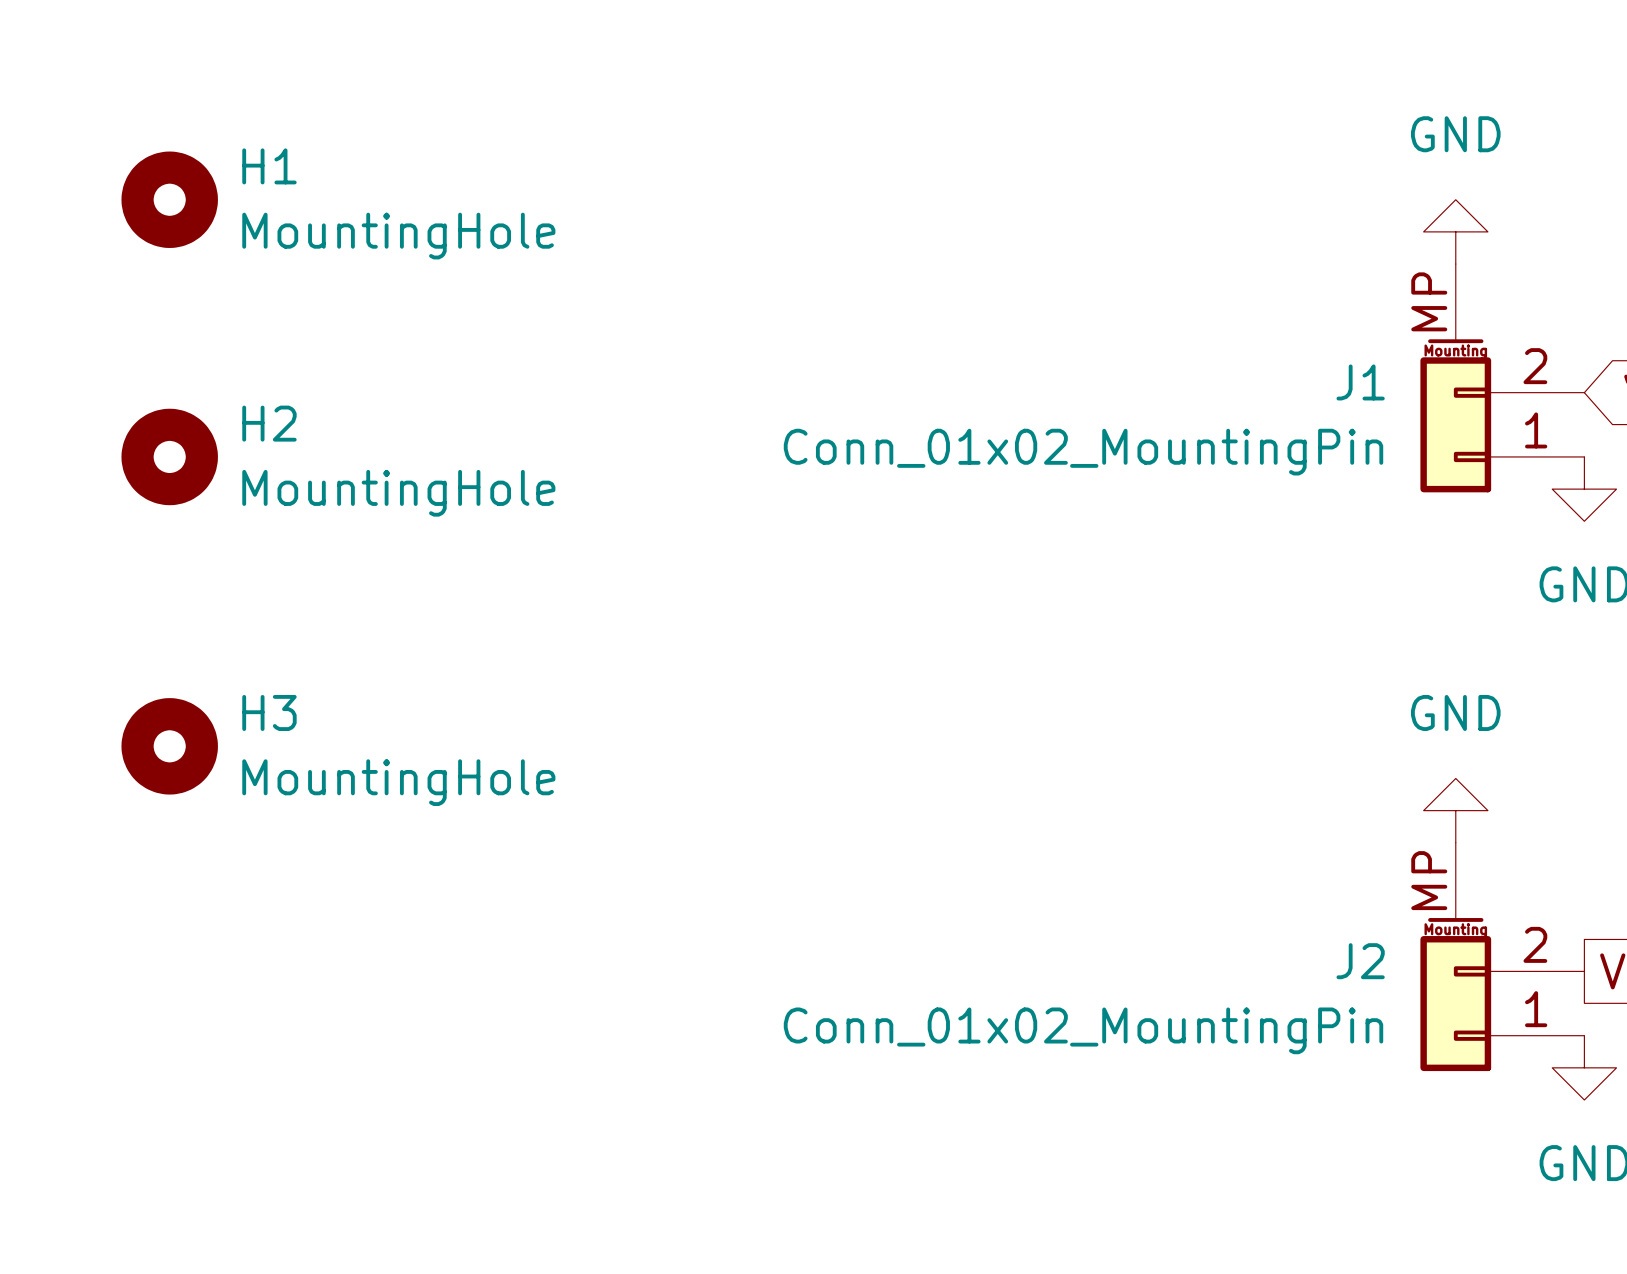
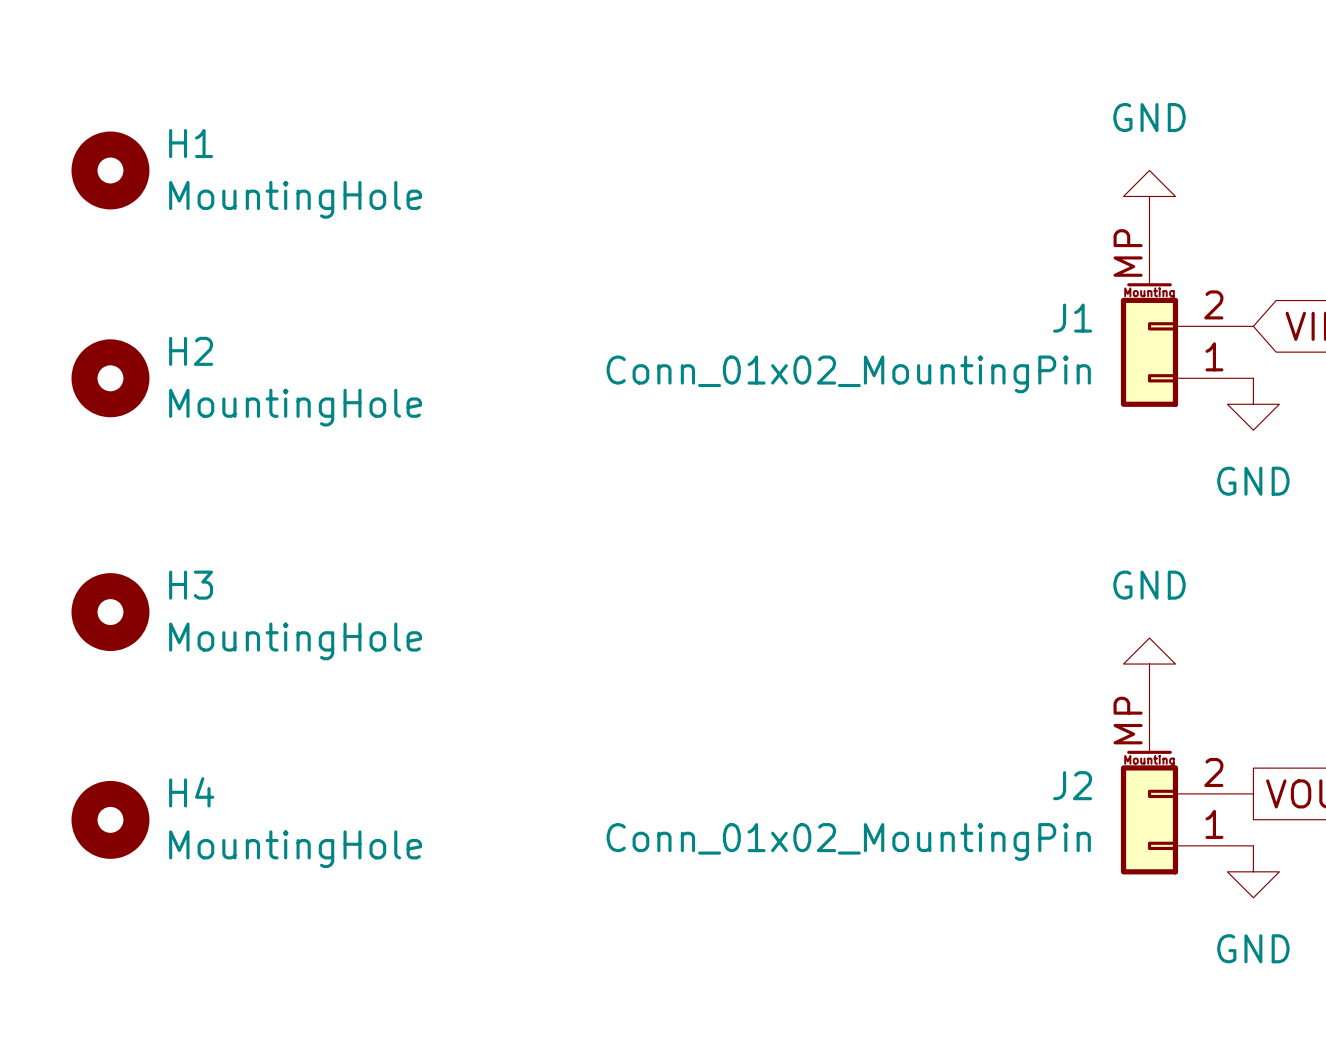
H4: none -> MountingHole (110, 819)

